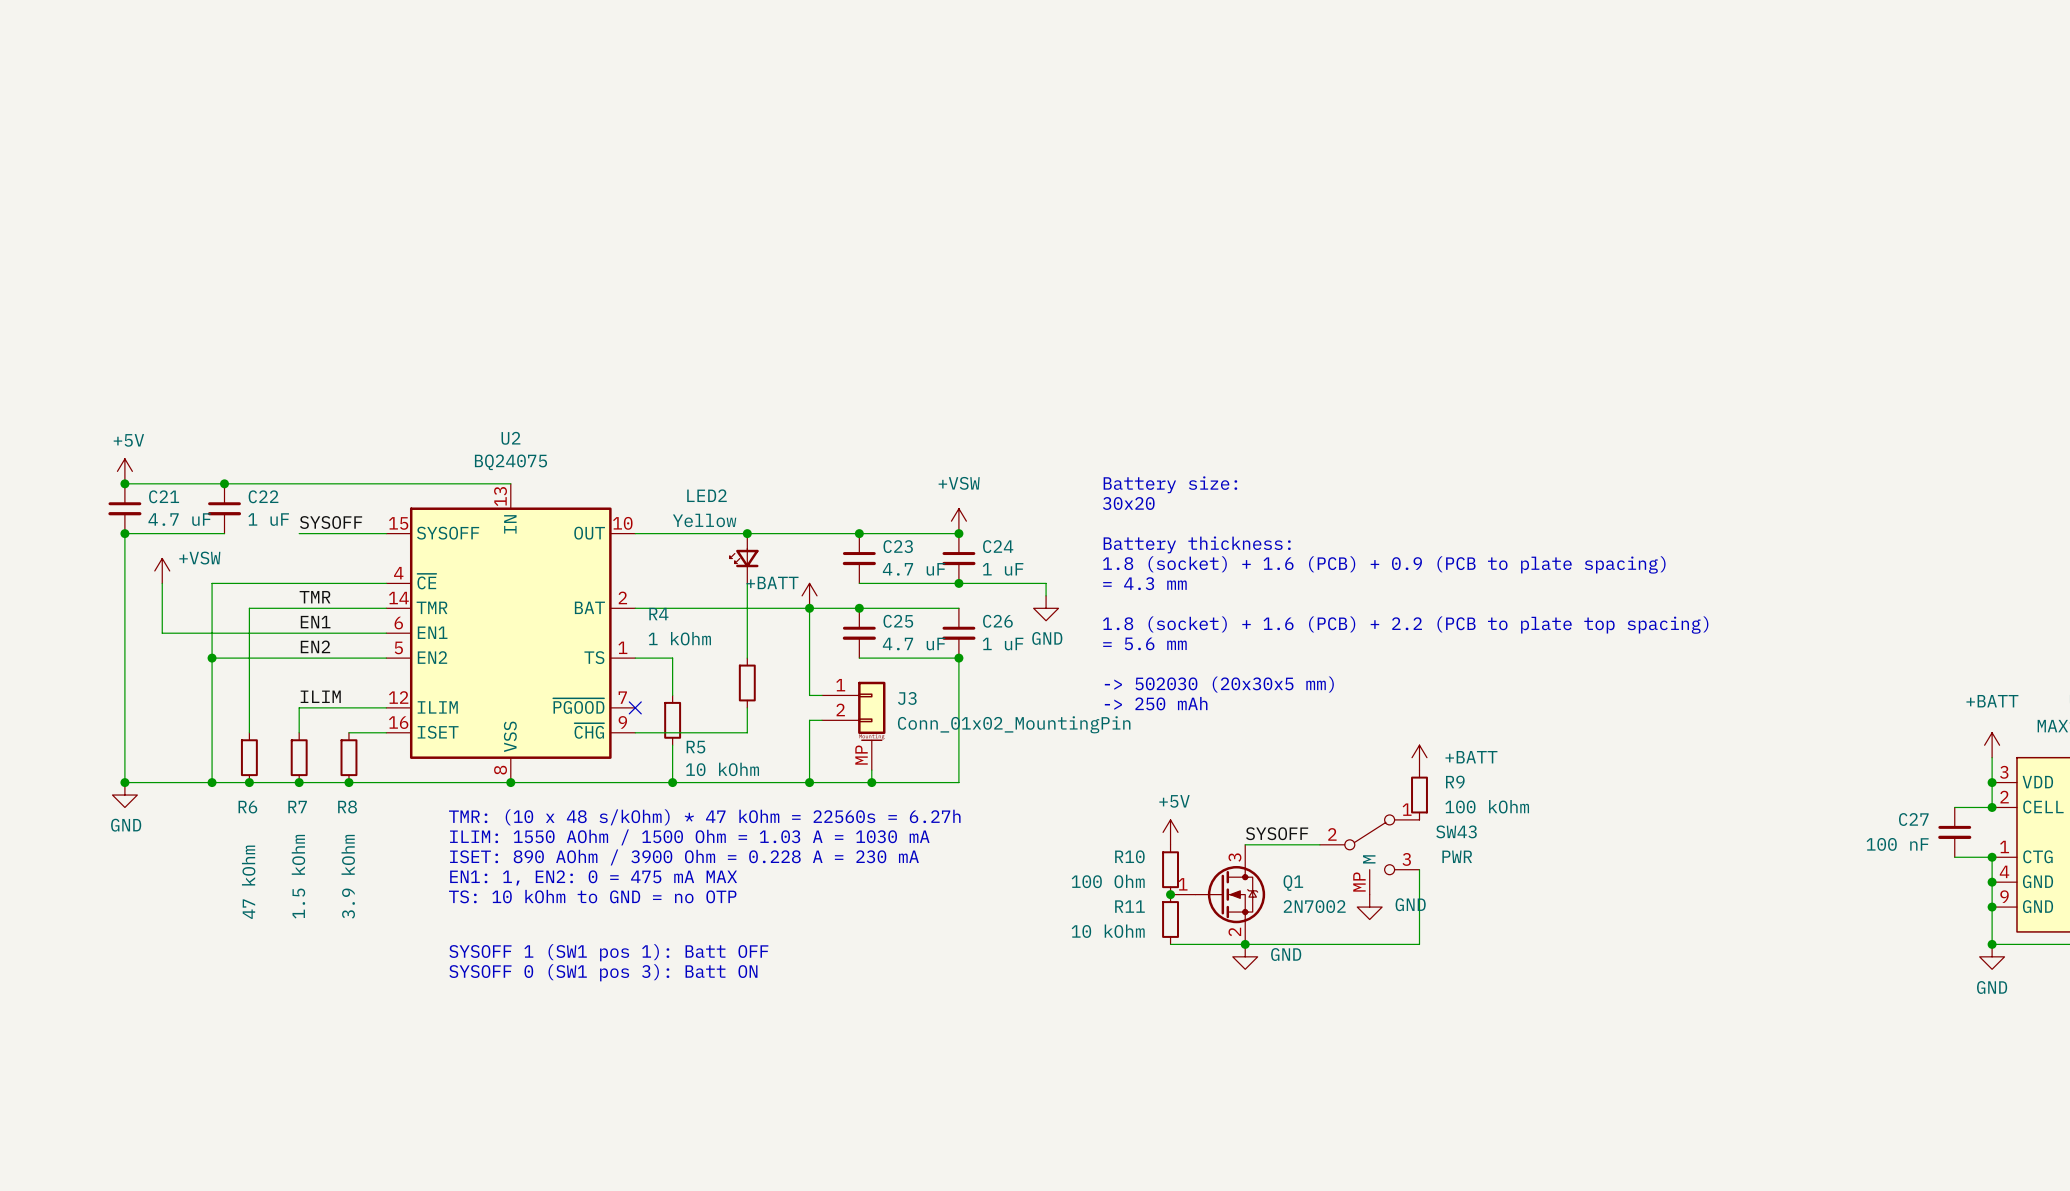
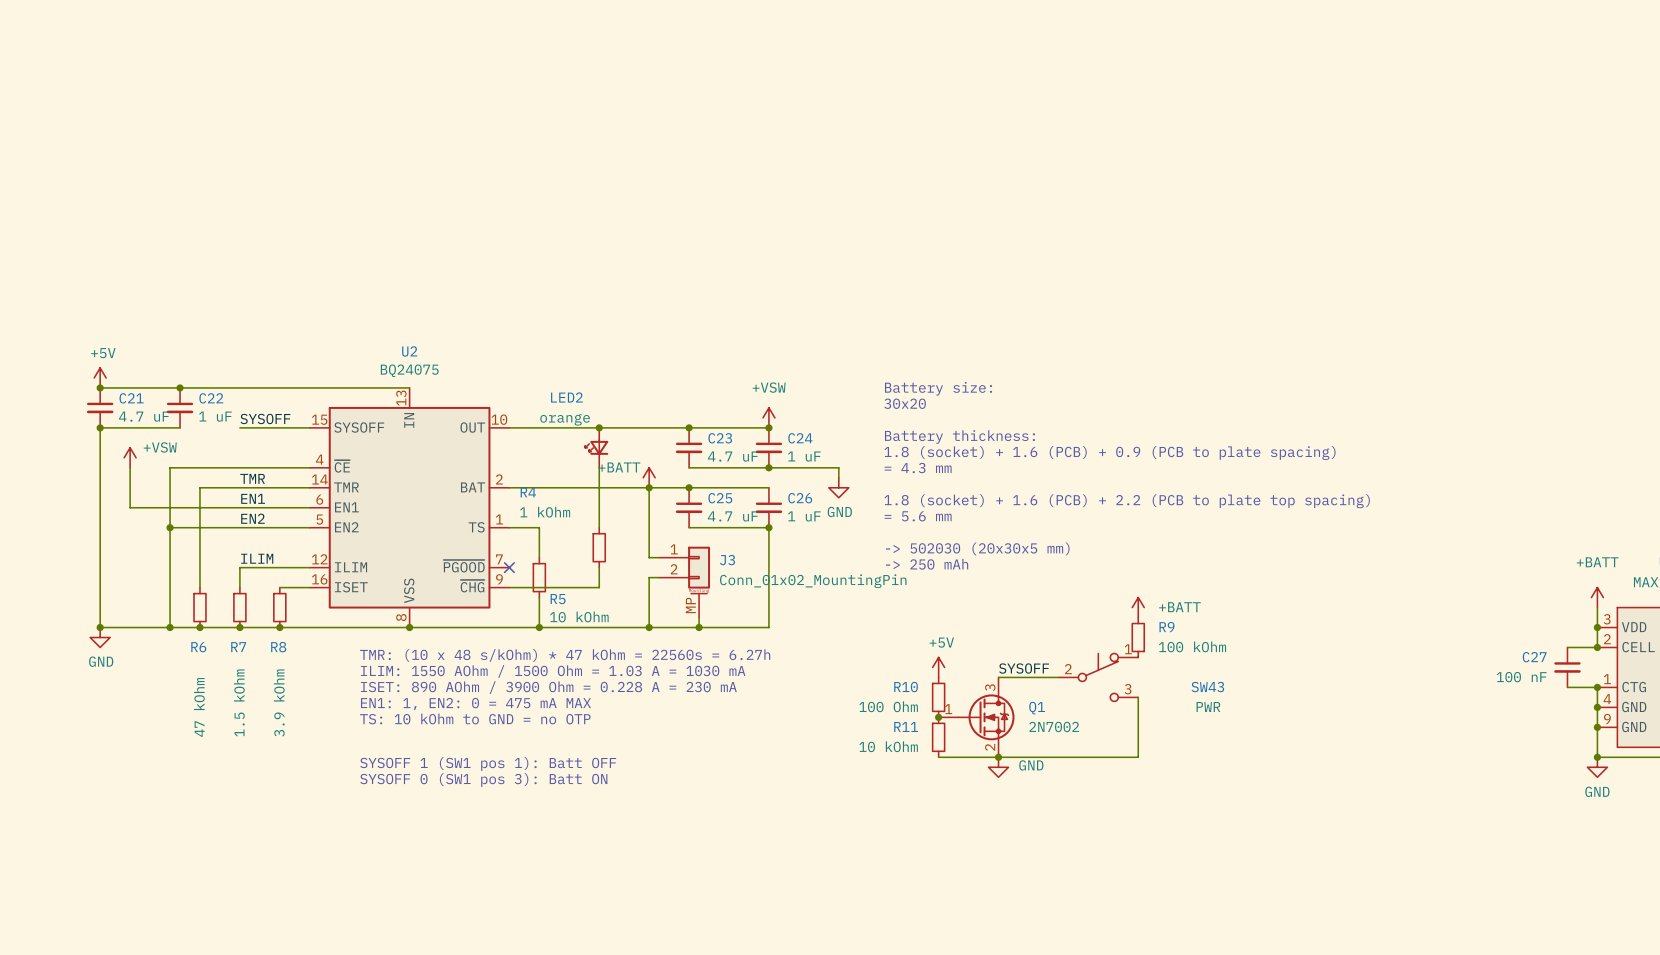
LED2 value: Yellow (704, 520) -> orange (565, 419)
SW43 symbol: [1319, 814, 1420, 895] -> [1058, 653, 1139, 702]
SW43 name position: SW43 (1456, 831) -> SW43 (1207, 687)
SW43 value position: PWR (1457, 856) -> PWR (1208, 707)
power symbol: GND (1369, 907) -> none

